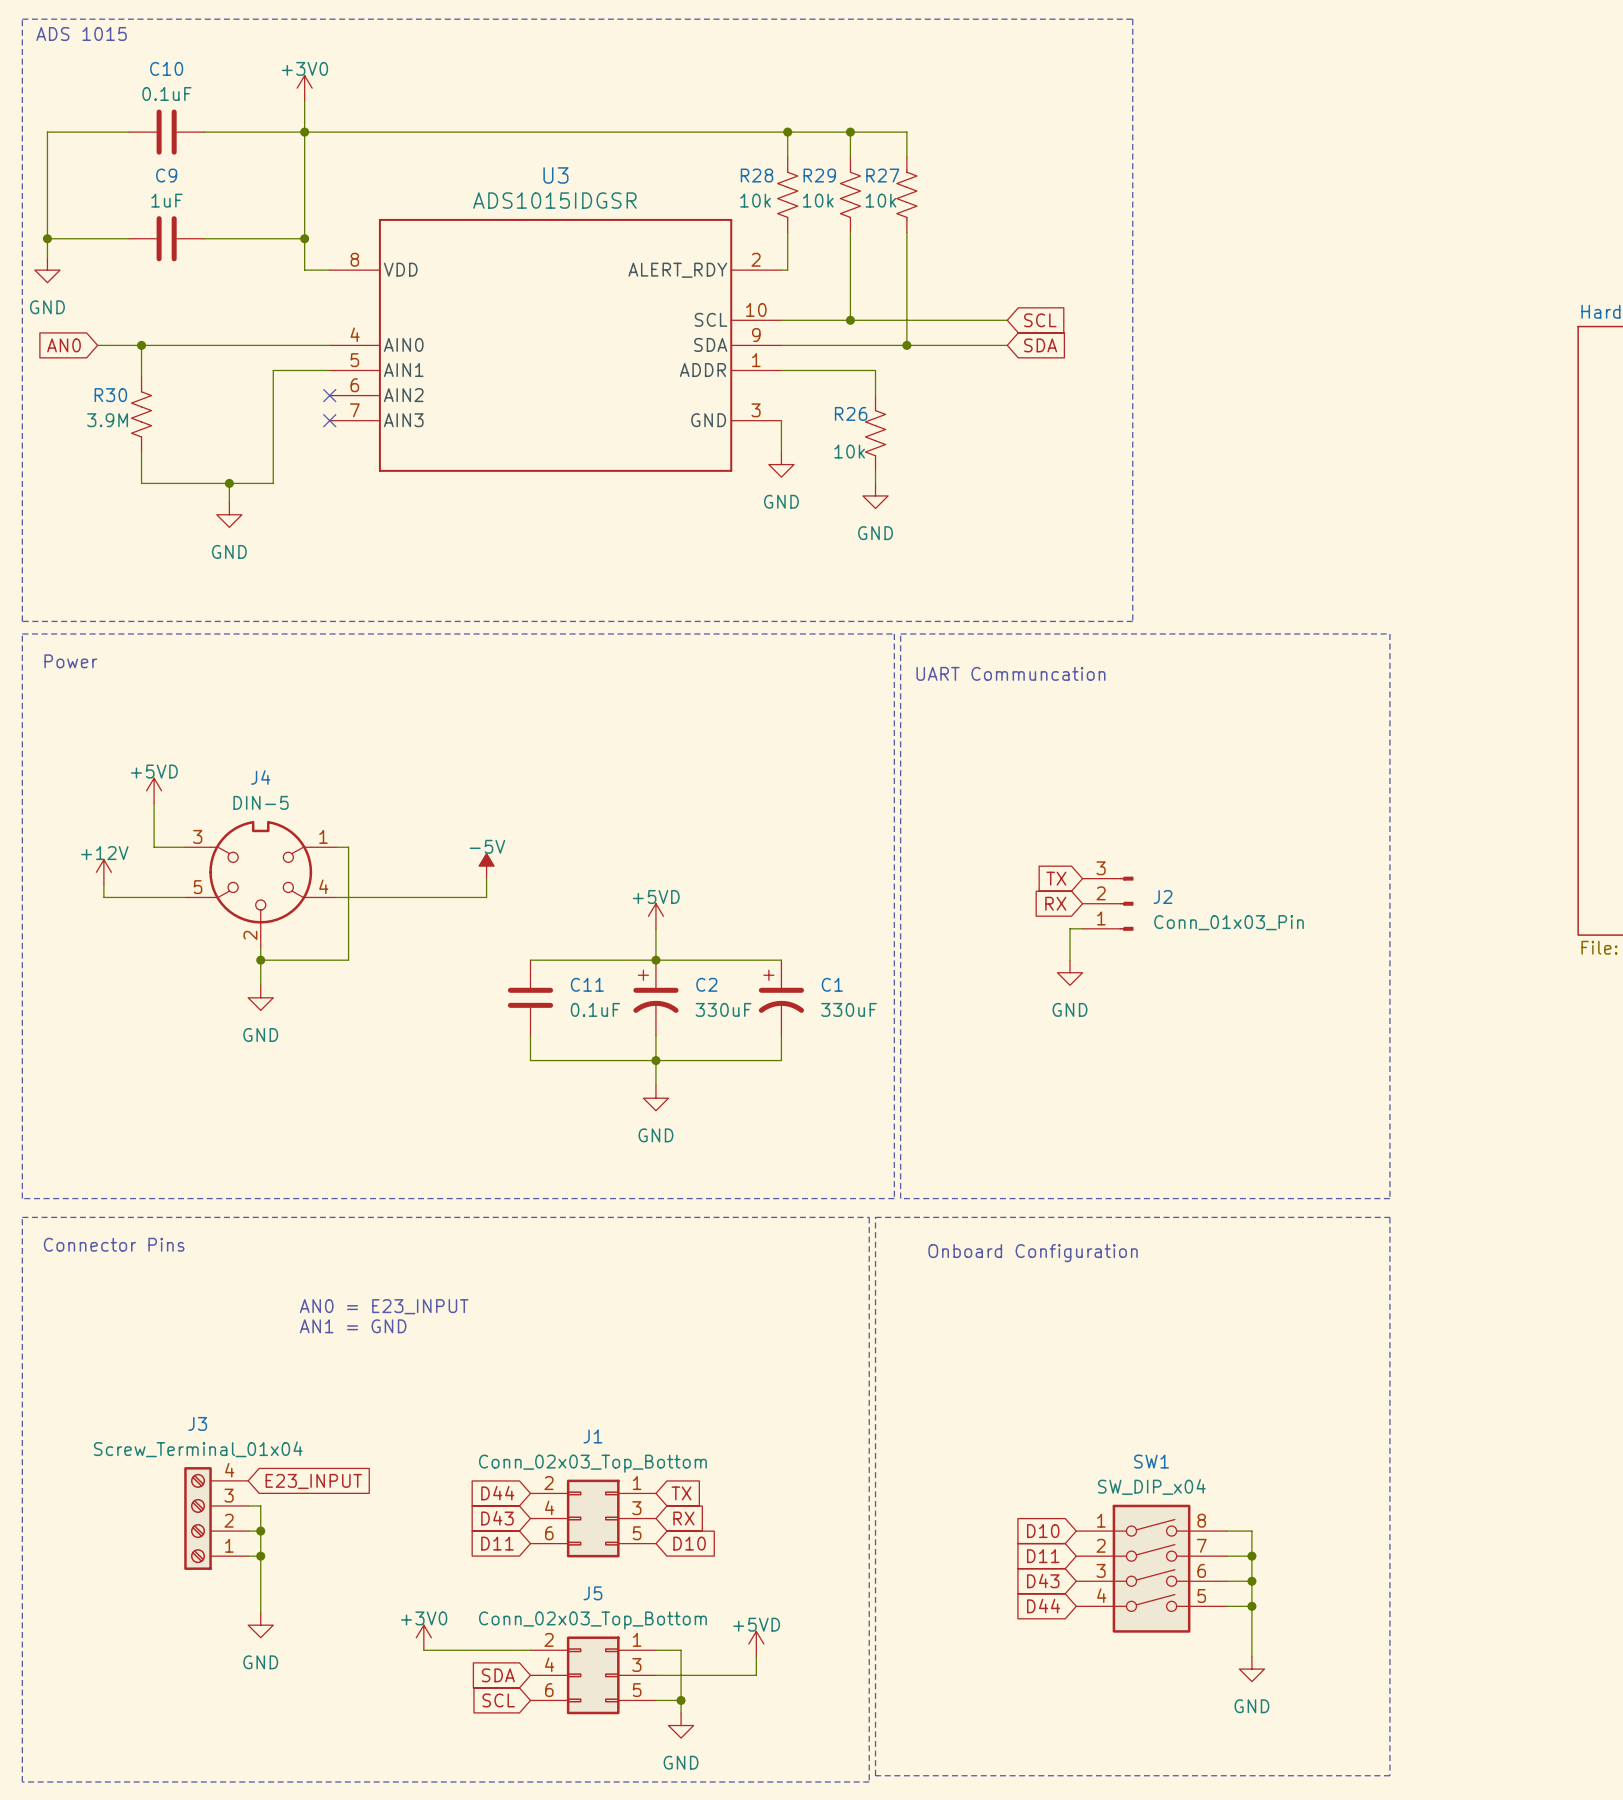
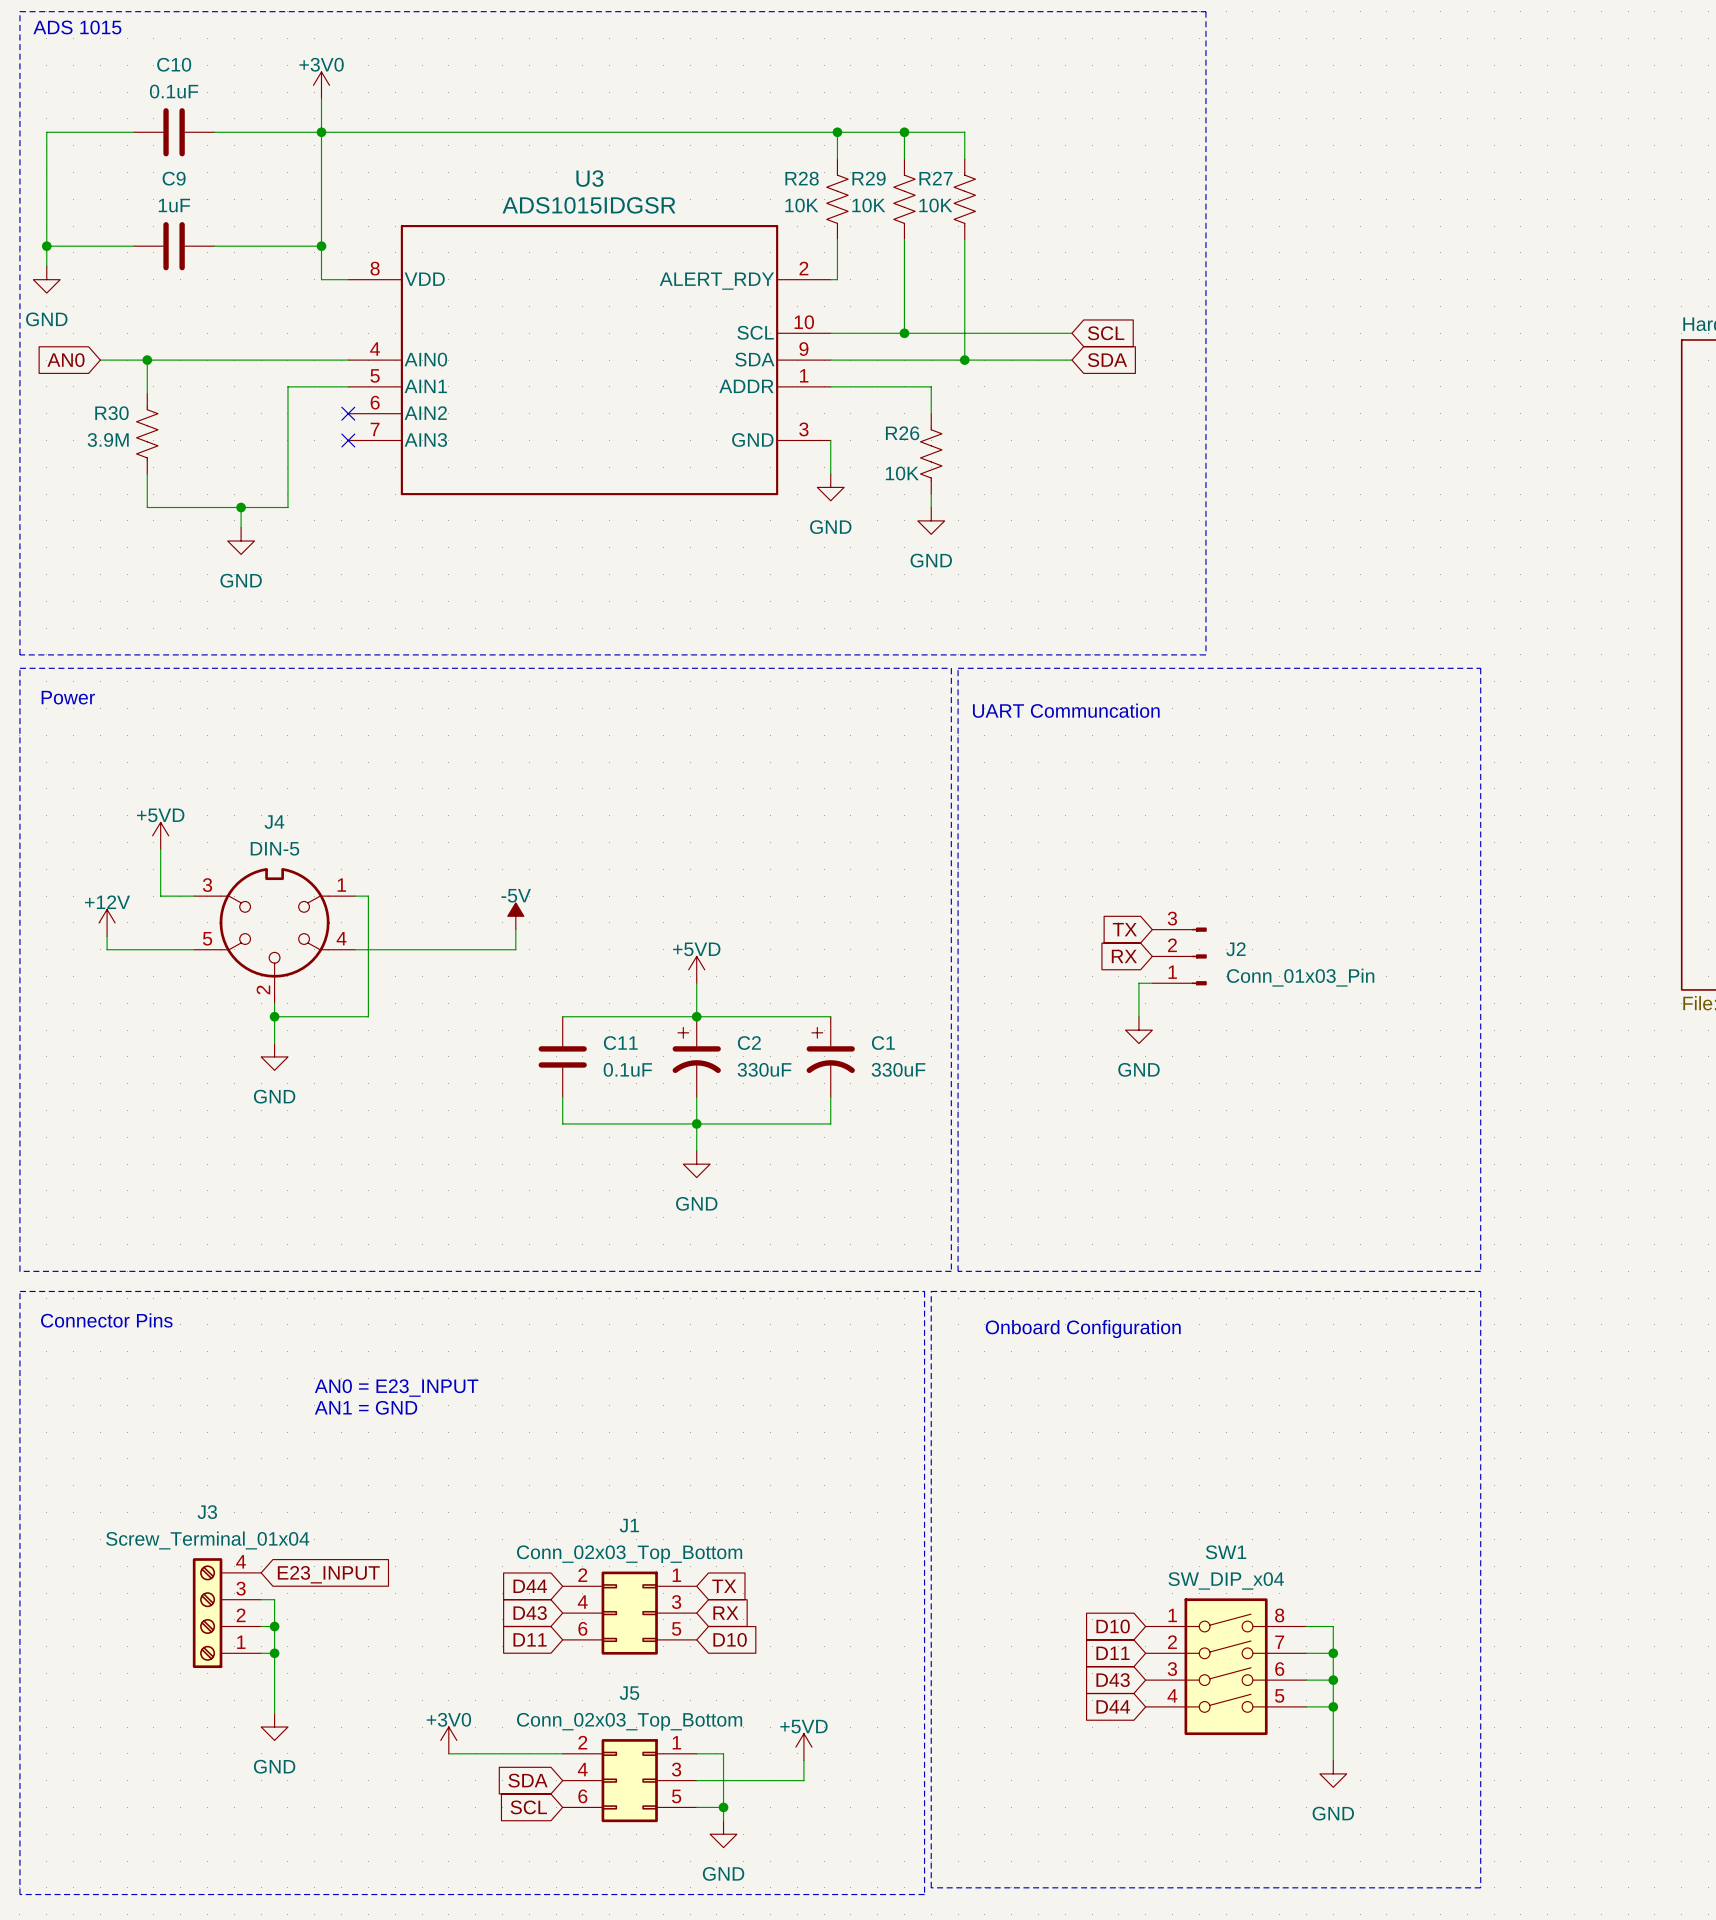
R28 value: 10k (755, 200) -> 10K (801, 205)
R29 value: 10k (818, 200) -> 10K (868, 205)
R27 value: 10k (881, 200) -> 10K (935, 205)
R26 value: 10k (849, 451) -> 10K (902, 473)

